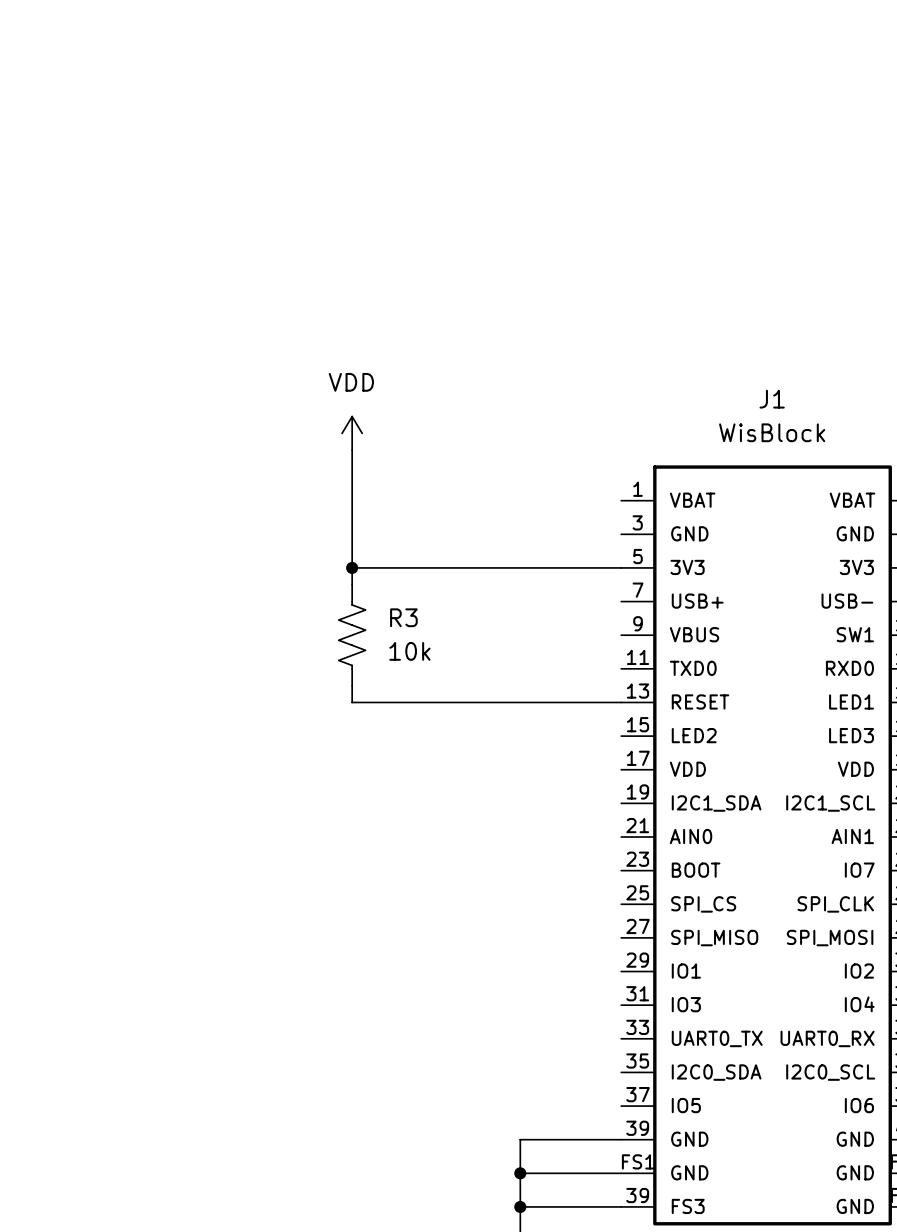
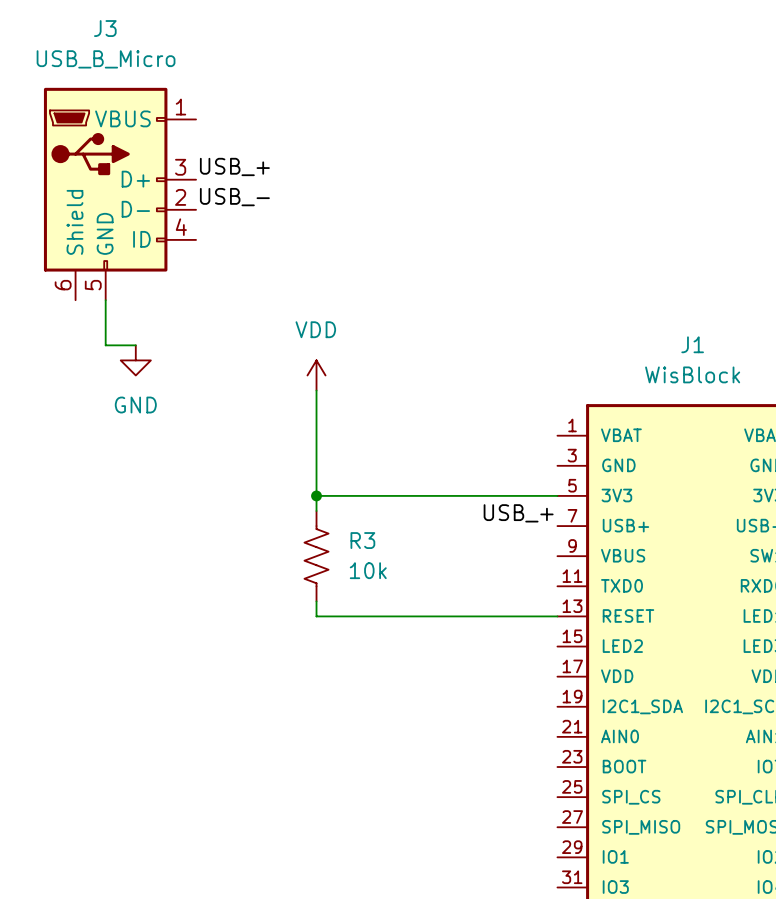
label: none -> USB_+ (234, 166)
J3: none -> USB_B_Micro (119, 194)
label: none -> USB_- (234, 197)
wire: none -> (105, 300) (105, 345) (135, 345)
power symbol: none -> GND (135, 360)
label: none -> USB_+ (518, 513)

